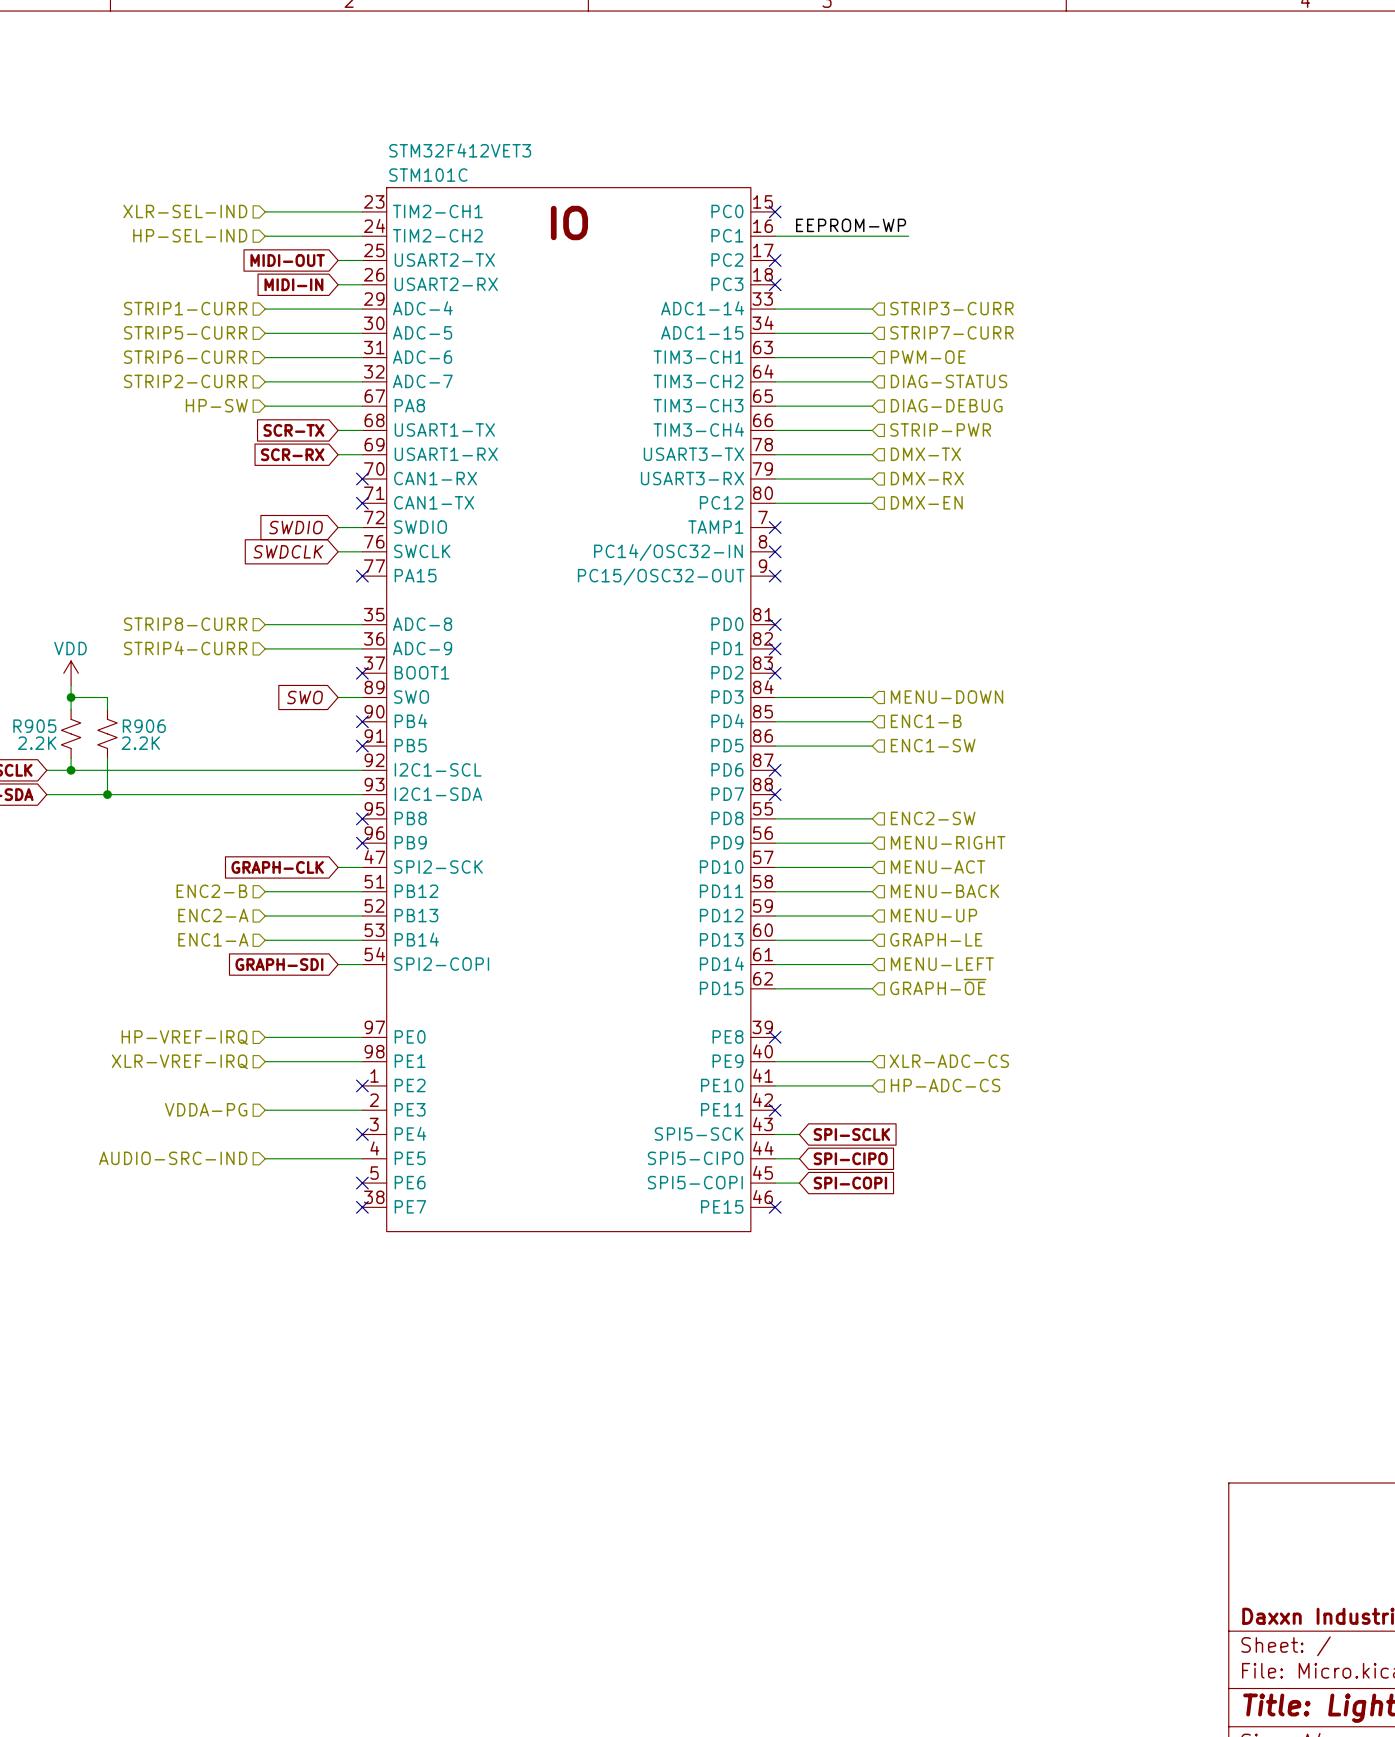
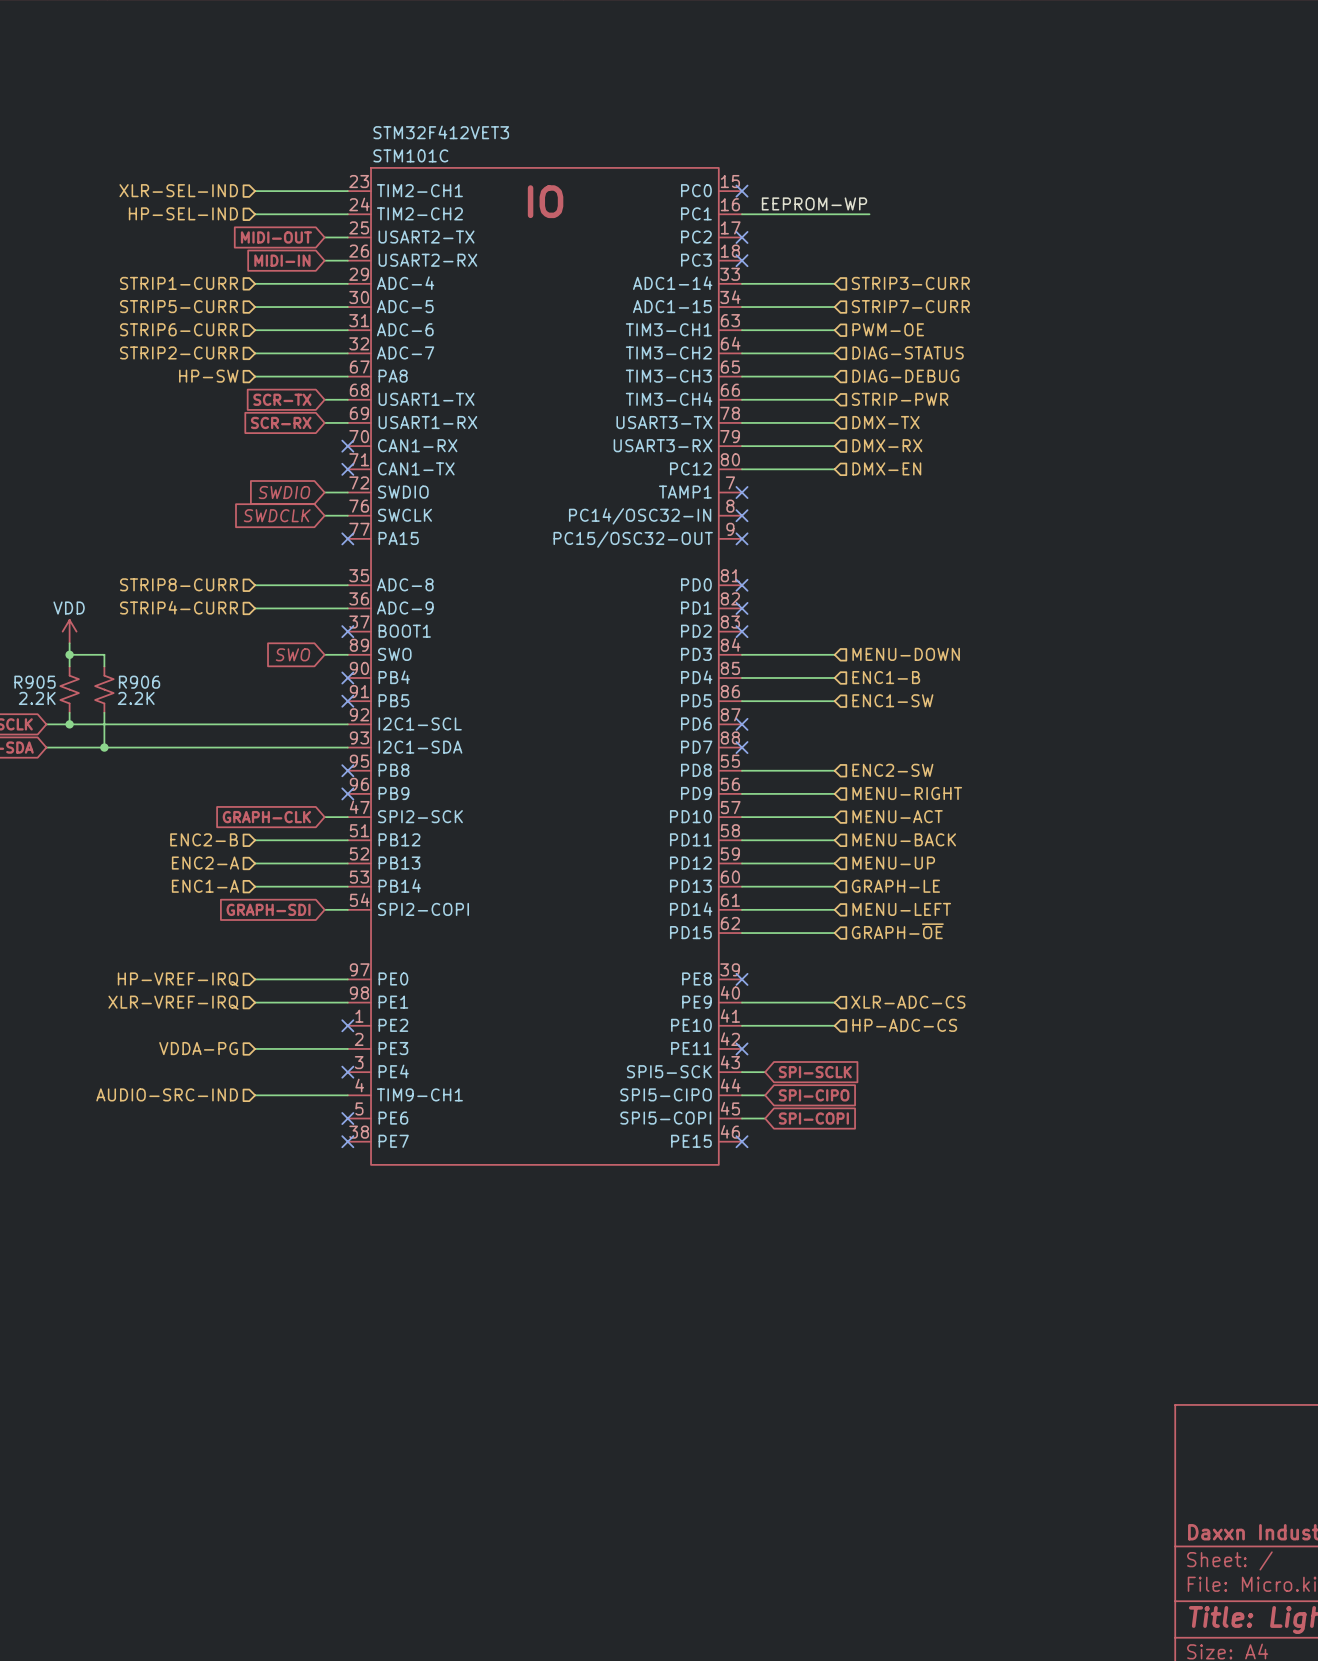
STM101C pin name: PE5 (410, 1158) -> TIM9-CH1 (419, 1094)

